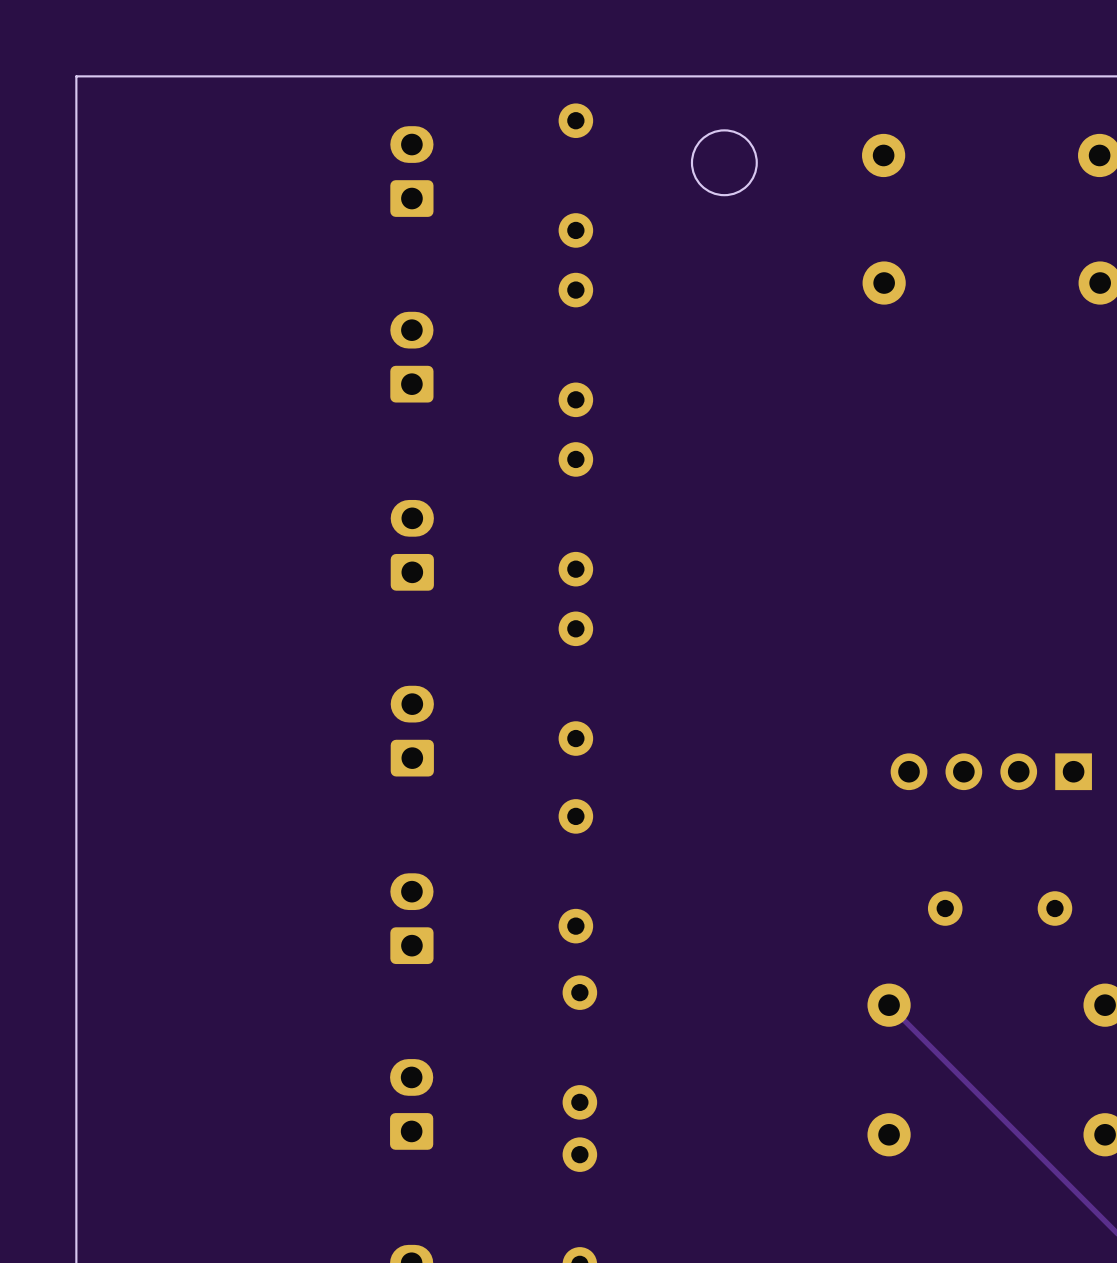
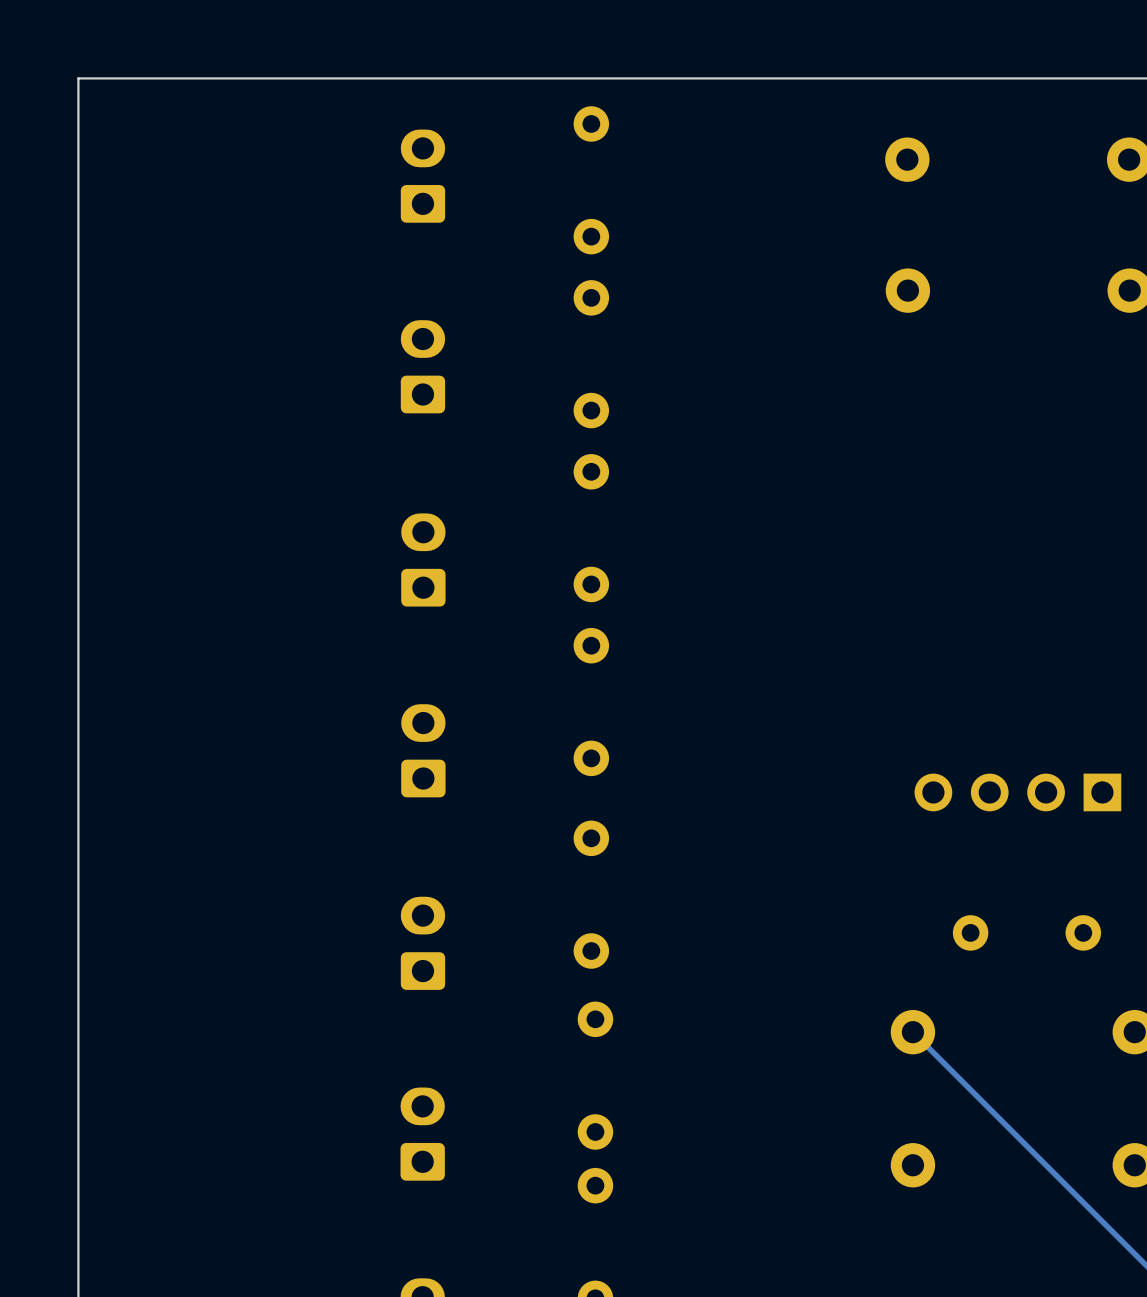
round board edge: [690, 129, 758, 197] -> none

